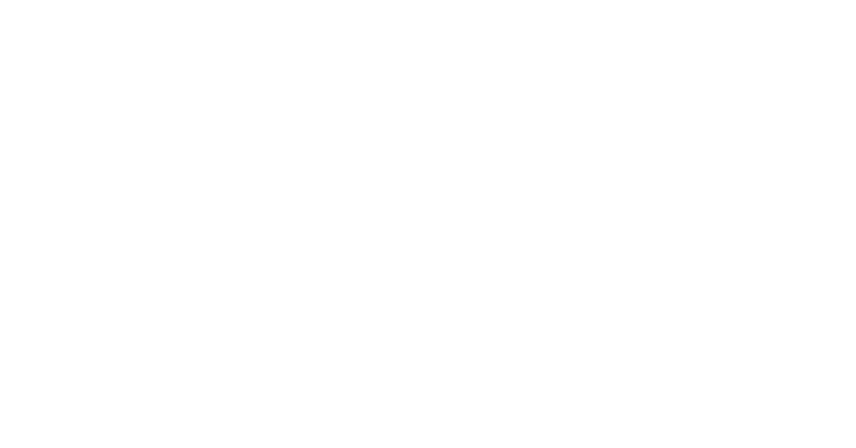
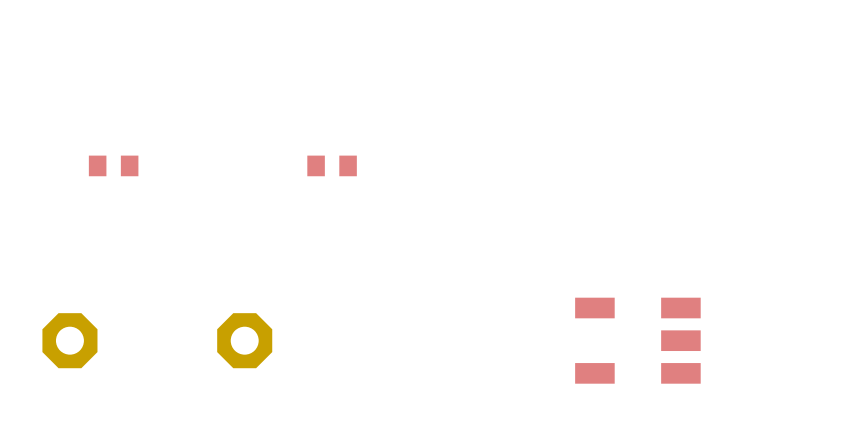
part: none -> (113, 165)
part: none -> (332, 165)
part: none -> (69, 340)
part: none -> (244, 340)
part: none -> (637, 340)

